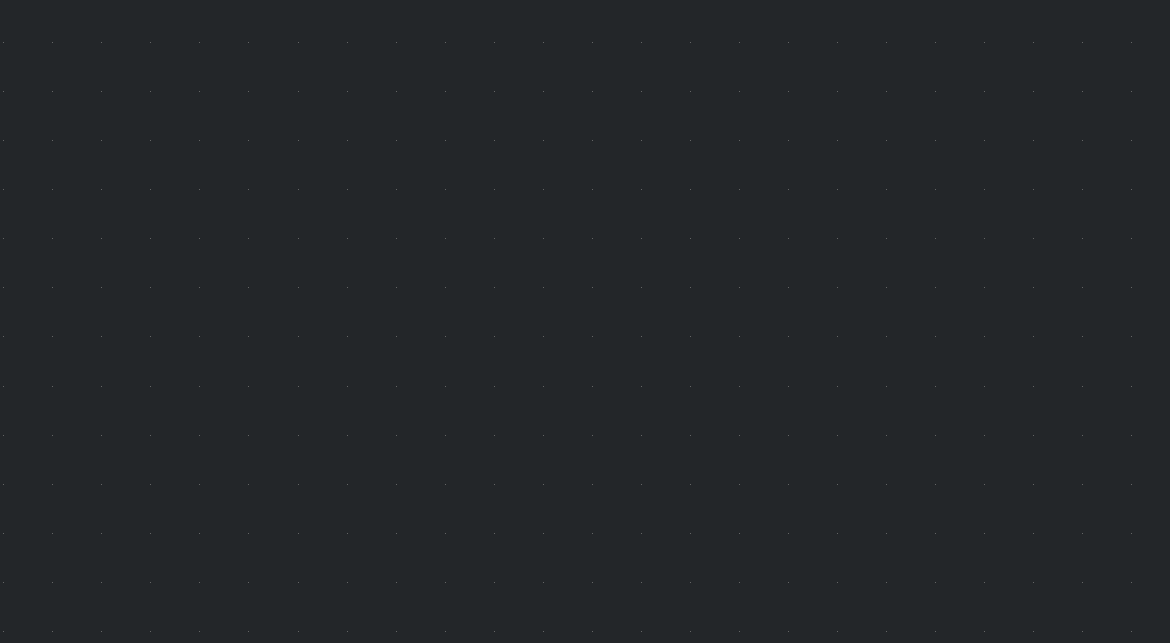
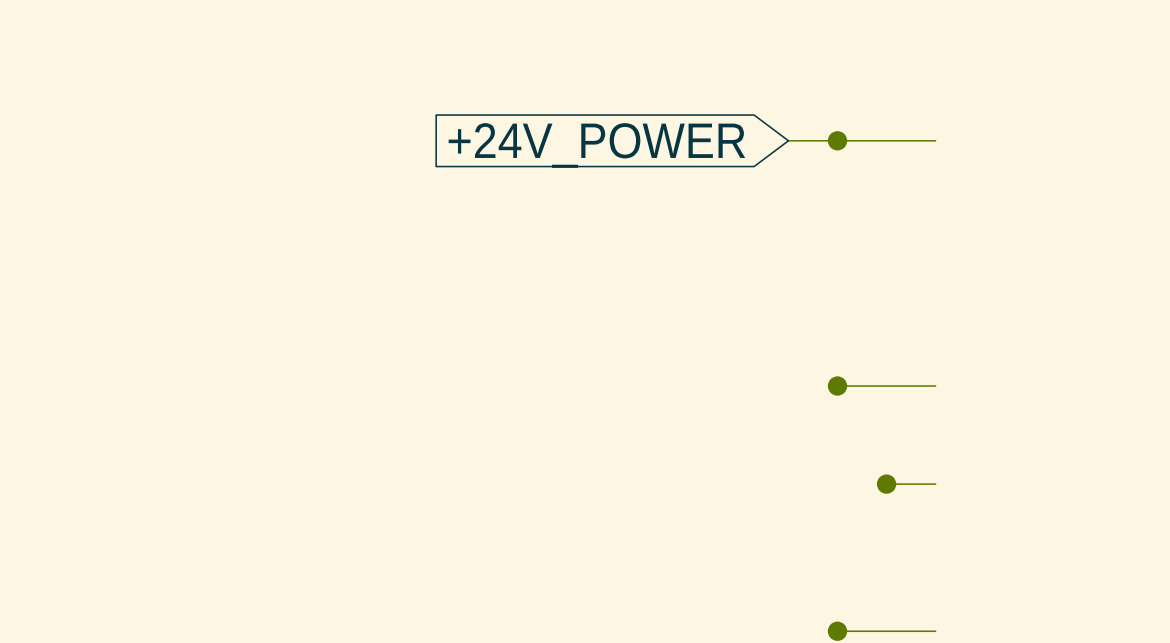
wire: none -> (788, 140) (935, 140)
junction: none -> (837, 140)
global label: none -> +24V_POWER (596, 145)
wire: none -> (837, 386) (935, 386)
junction: none -> (837, 386)
wire: none -> (886, 484) (935, 484)
junction: none -> (886, 484)
wire: none -> (837, 631) (935, 631)
junction: none -> (837, 631)

